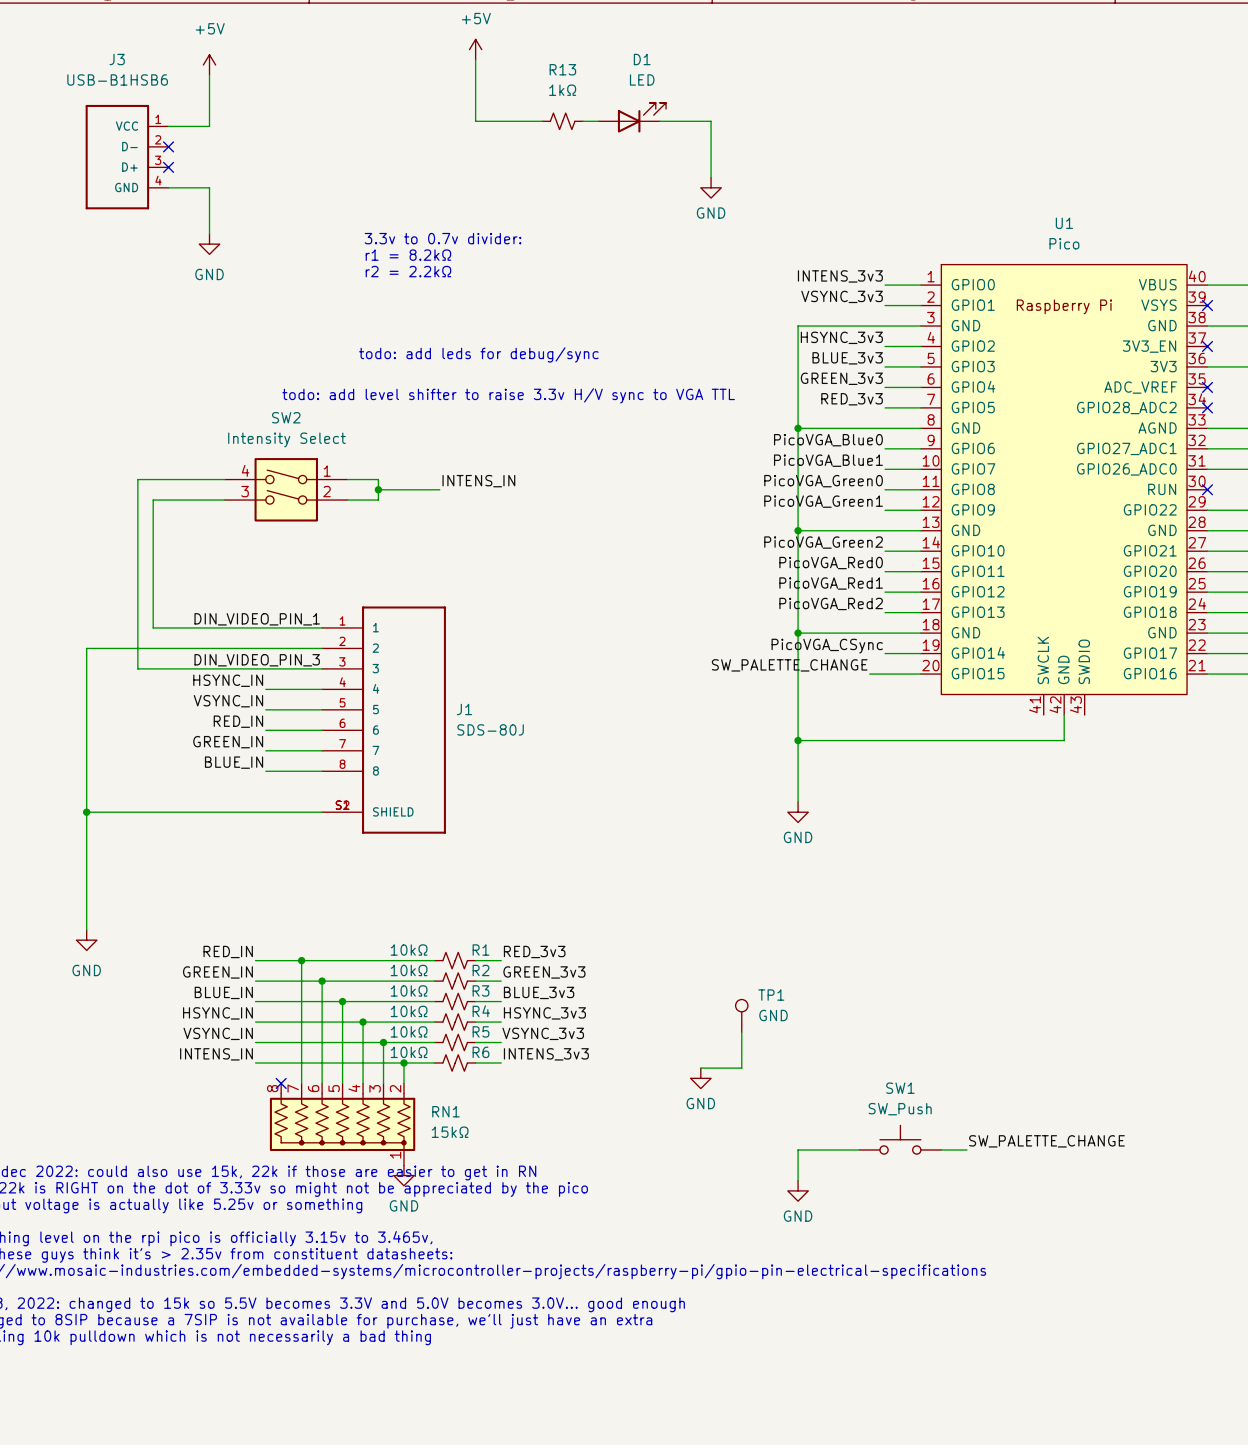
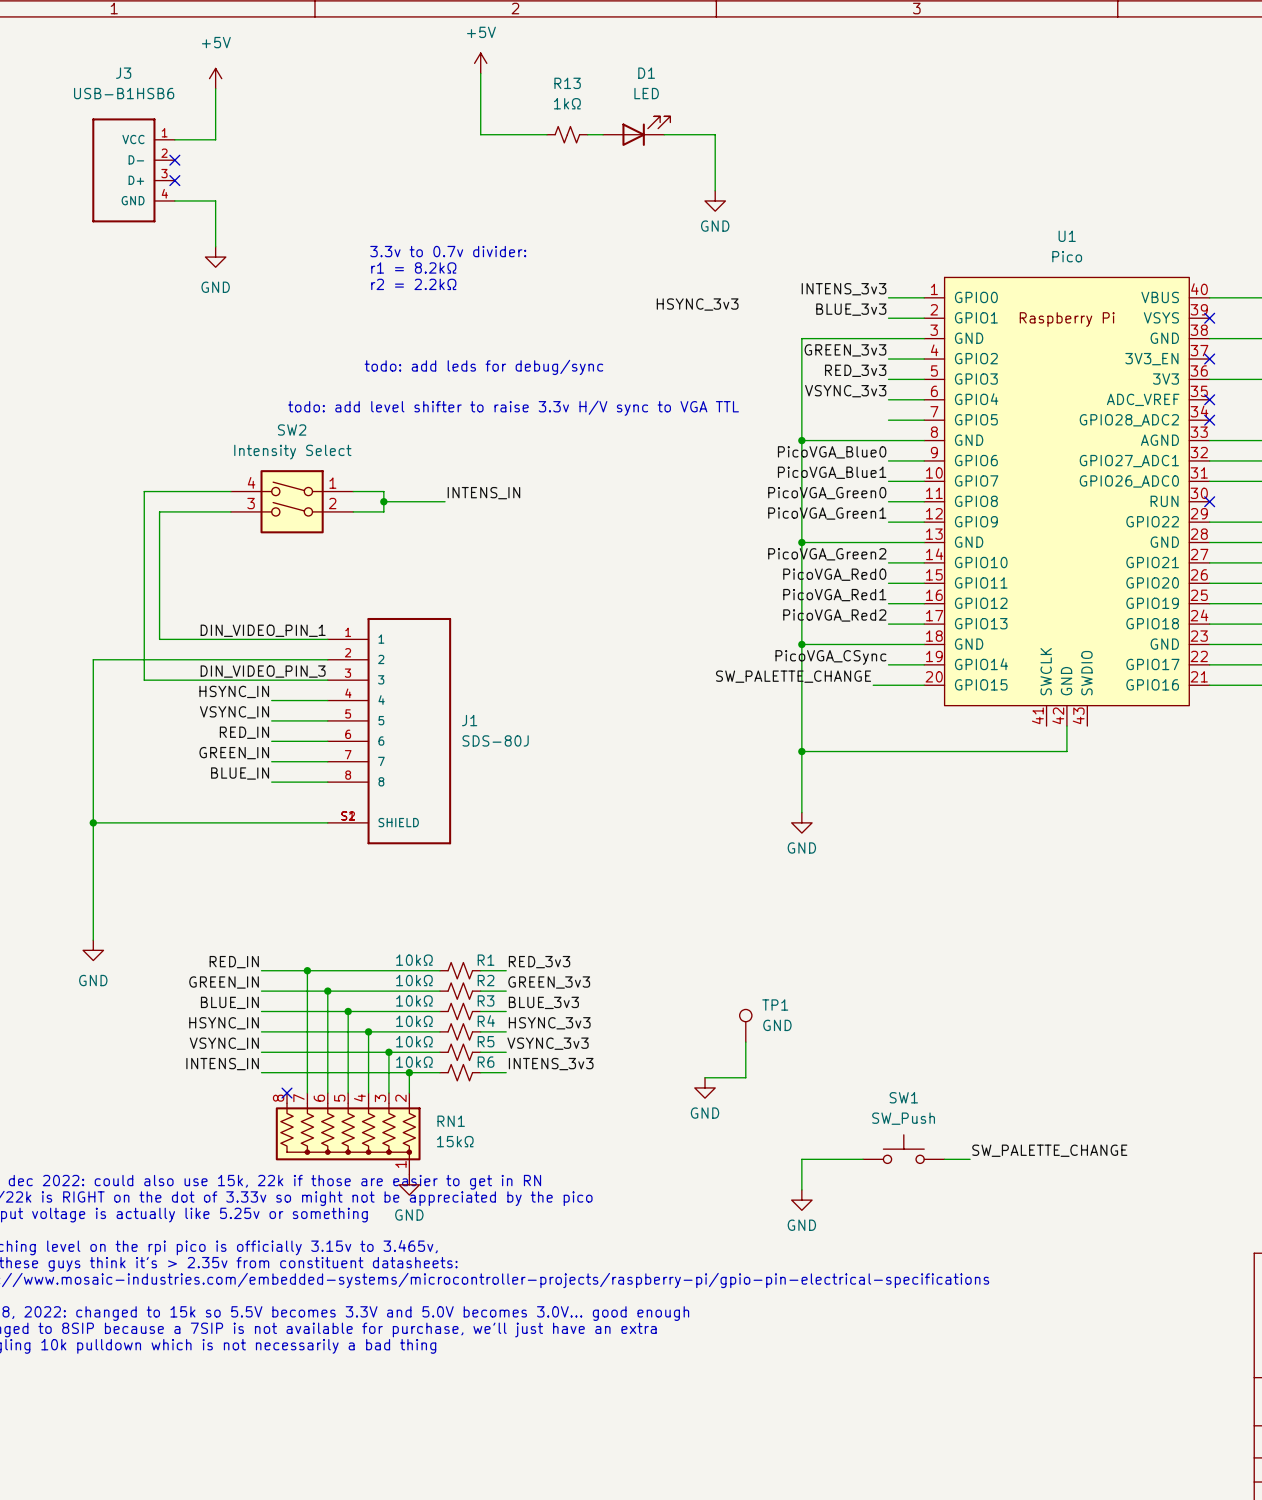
label: none -> HSYNC_3v3 (697, 304)
label: VSYNC_3v3 (842, 296) -> BLUE_3v3 (851, 309)
label: HSYNC_3v3 (841, 337) -> GREEN_3v3 (845, 350)
label: BLUE_3v3 (847, 358) -> RED_3v3 (855, 370)
label: GREEN_3v3 (841, 378) -> VSYNC_3v3 (845, 391)
label: RED_3v3 (852, 399) -> none

